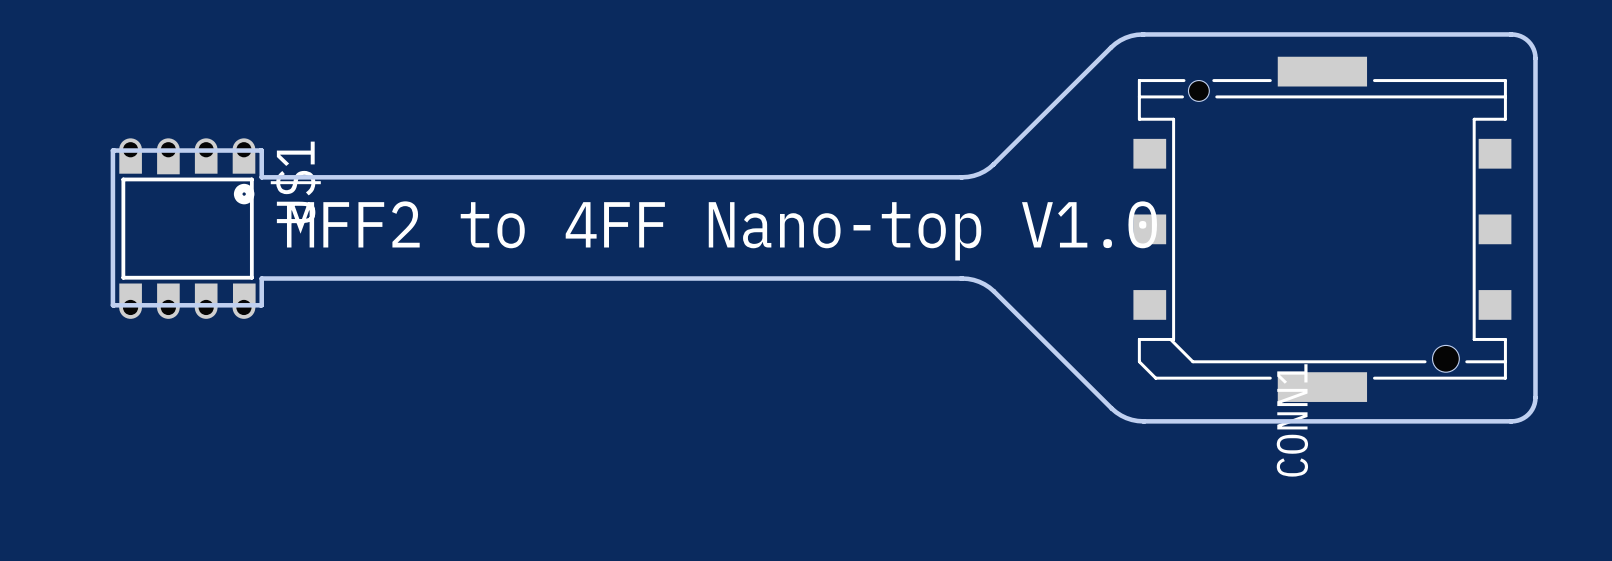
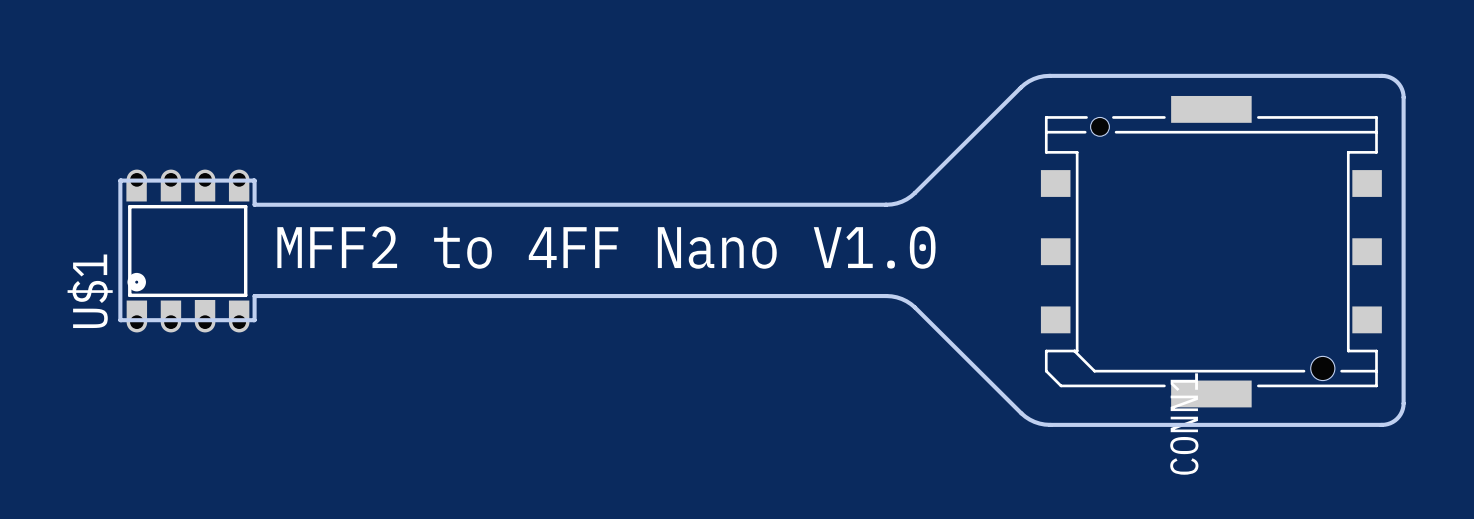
U$1 rotation: 0° (187, 228) -> 180° (187, 251)
text: MFF2 to 4FF Nano-top V1.0 (721, 230) -> MFF2 to 4FF Nano V1.0 (606, 247)

